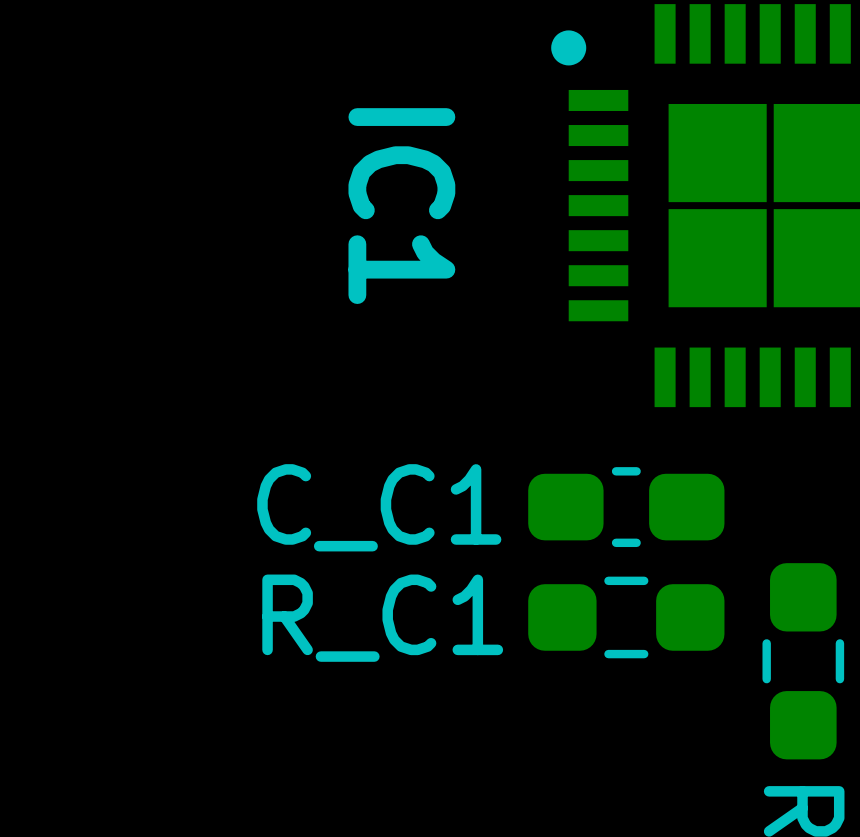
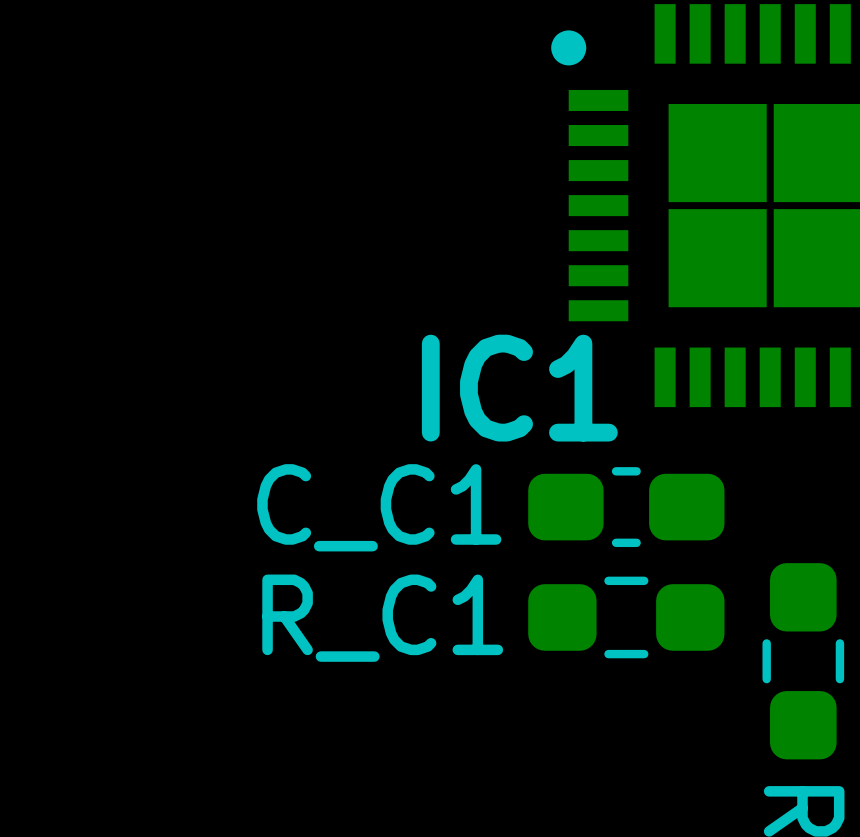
IC1 name rotation: 0° (401, 206) -> 90° counterclockwise (519, 388)

